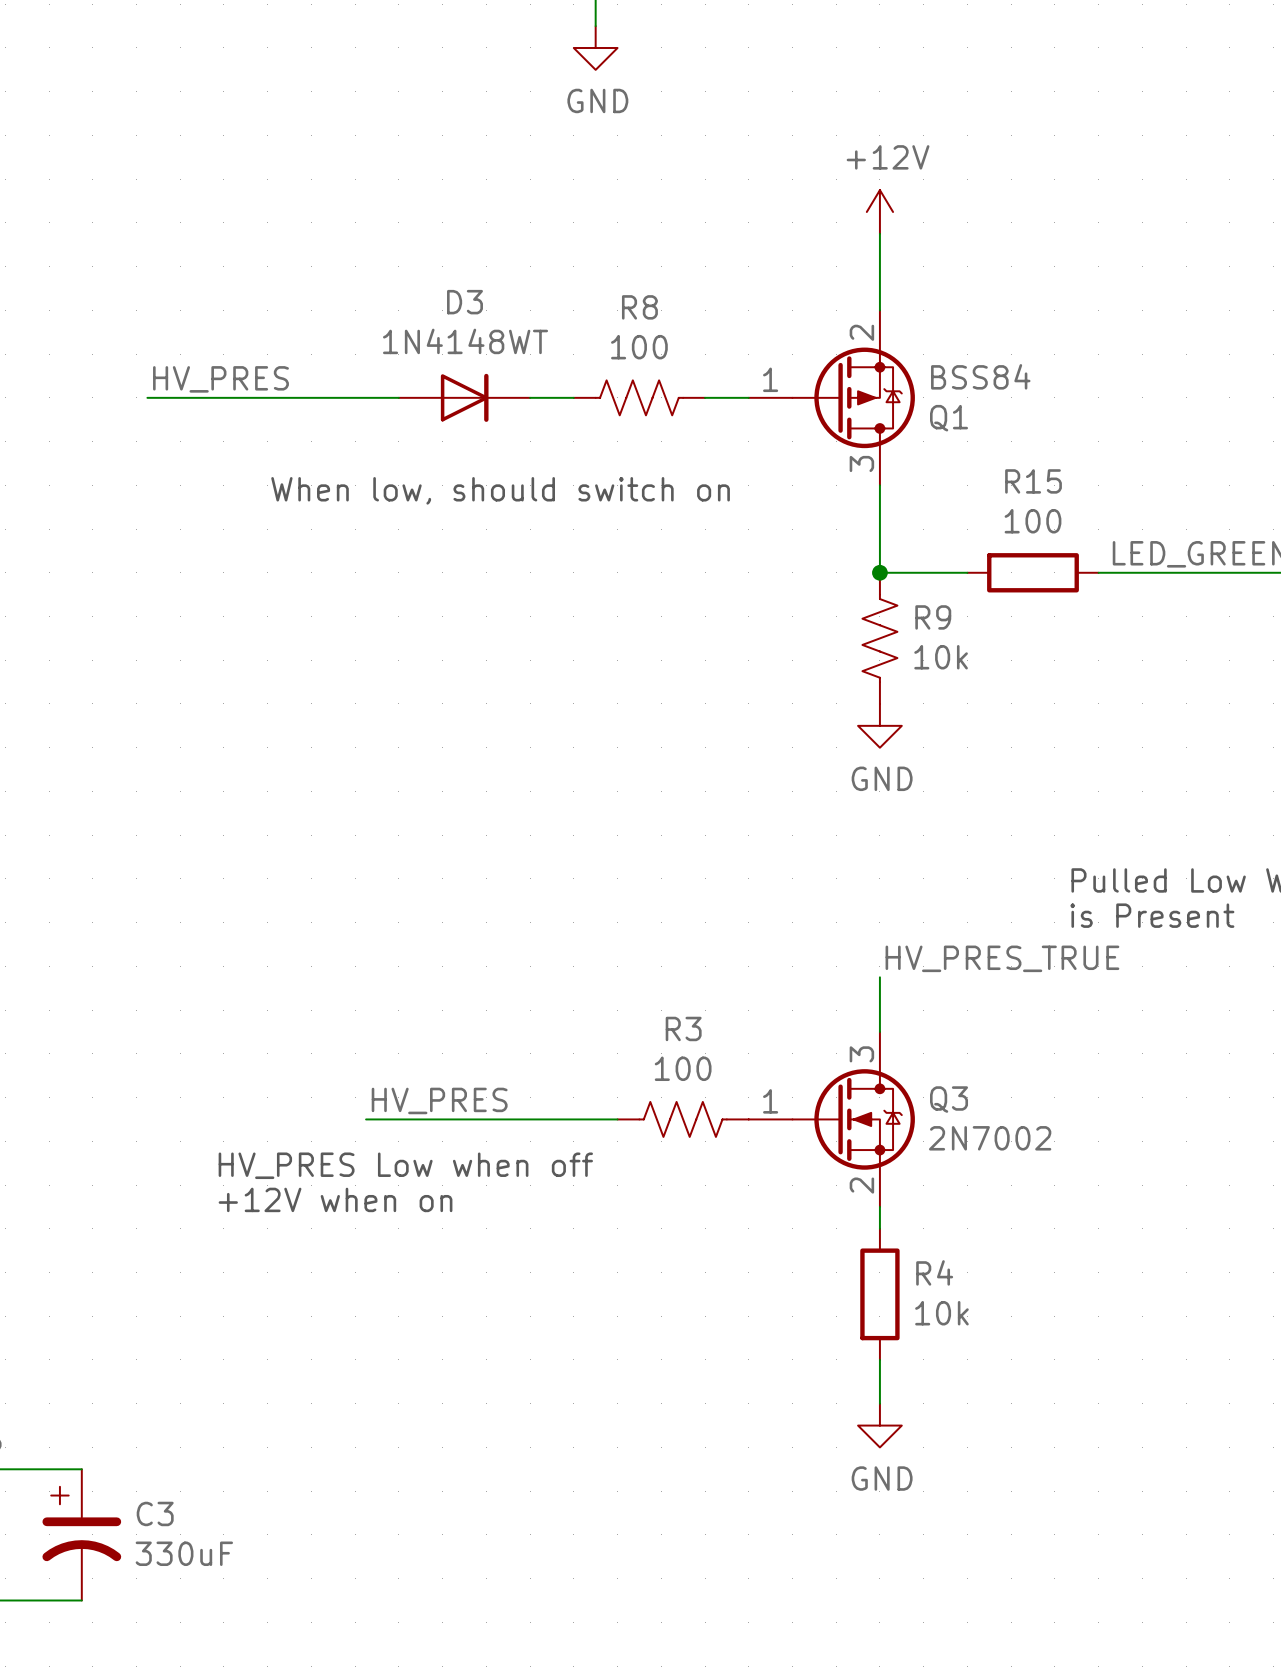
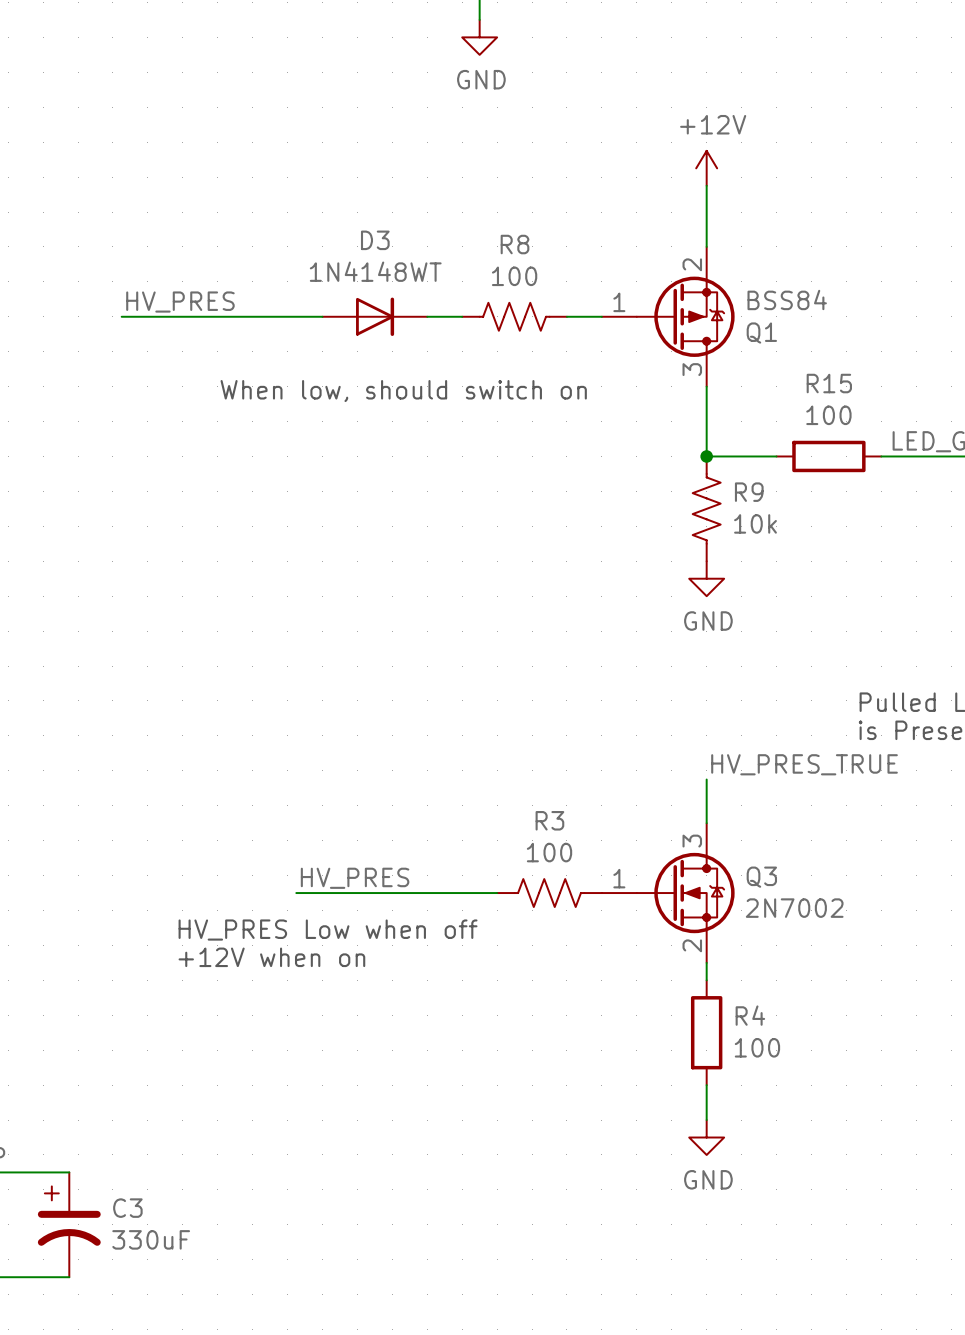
R4 value: 10k (941, 1313) -> 100 (757, 1047)

